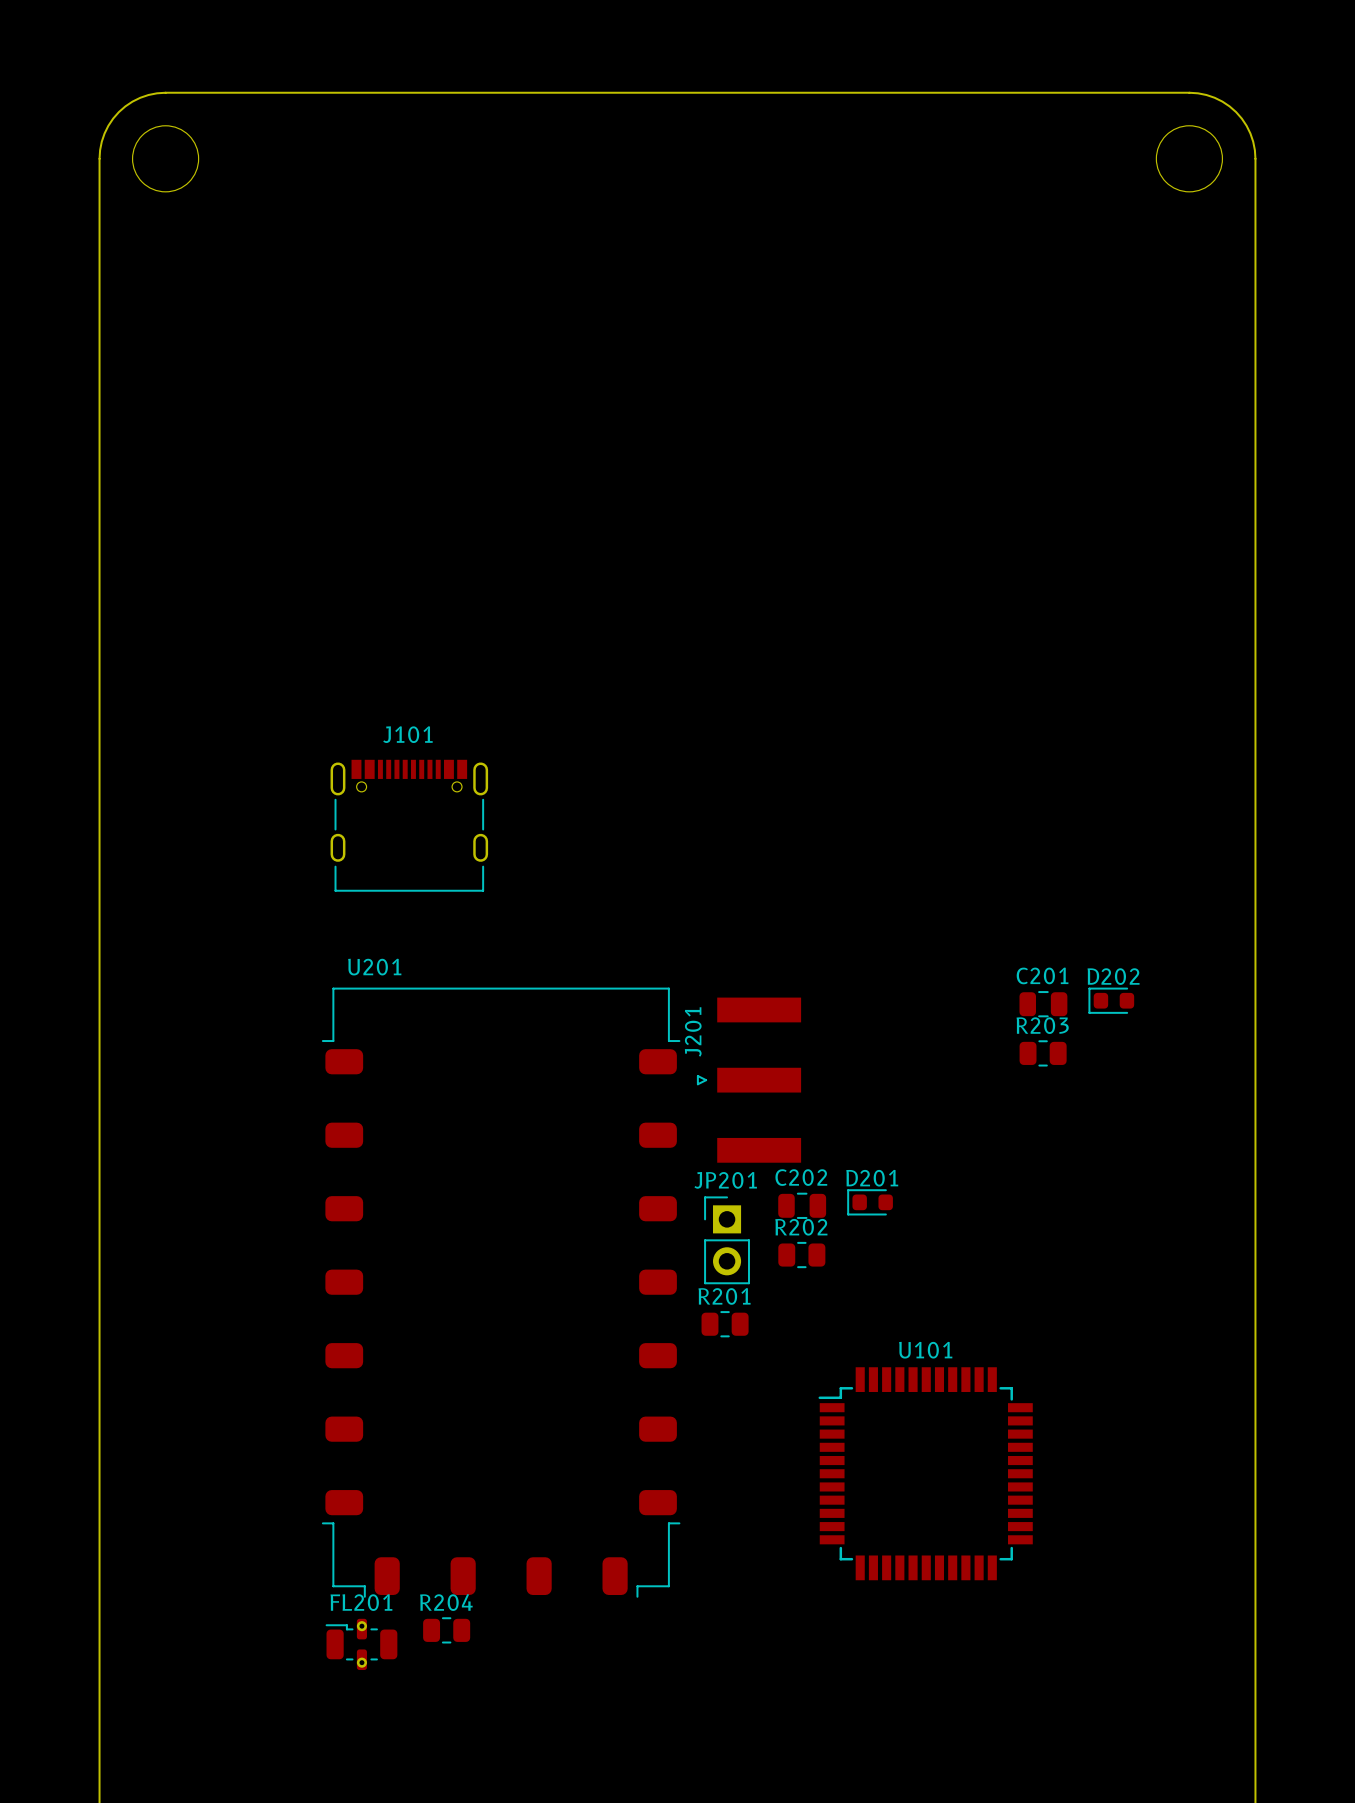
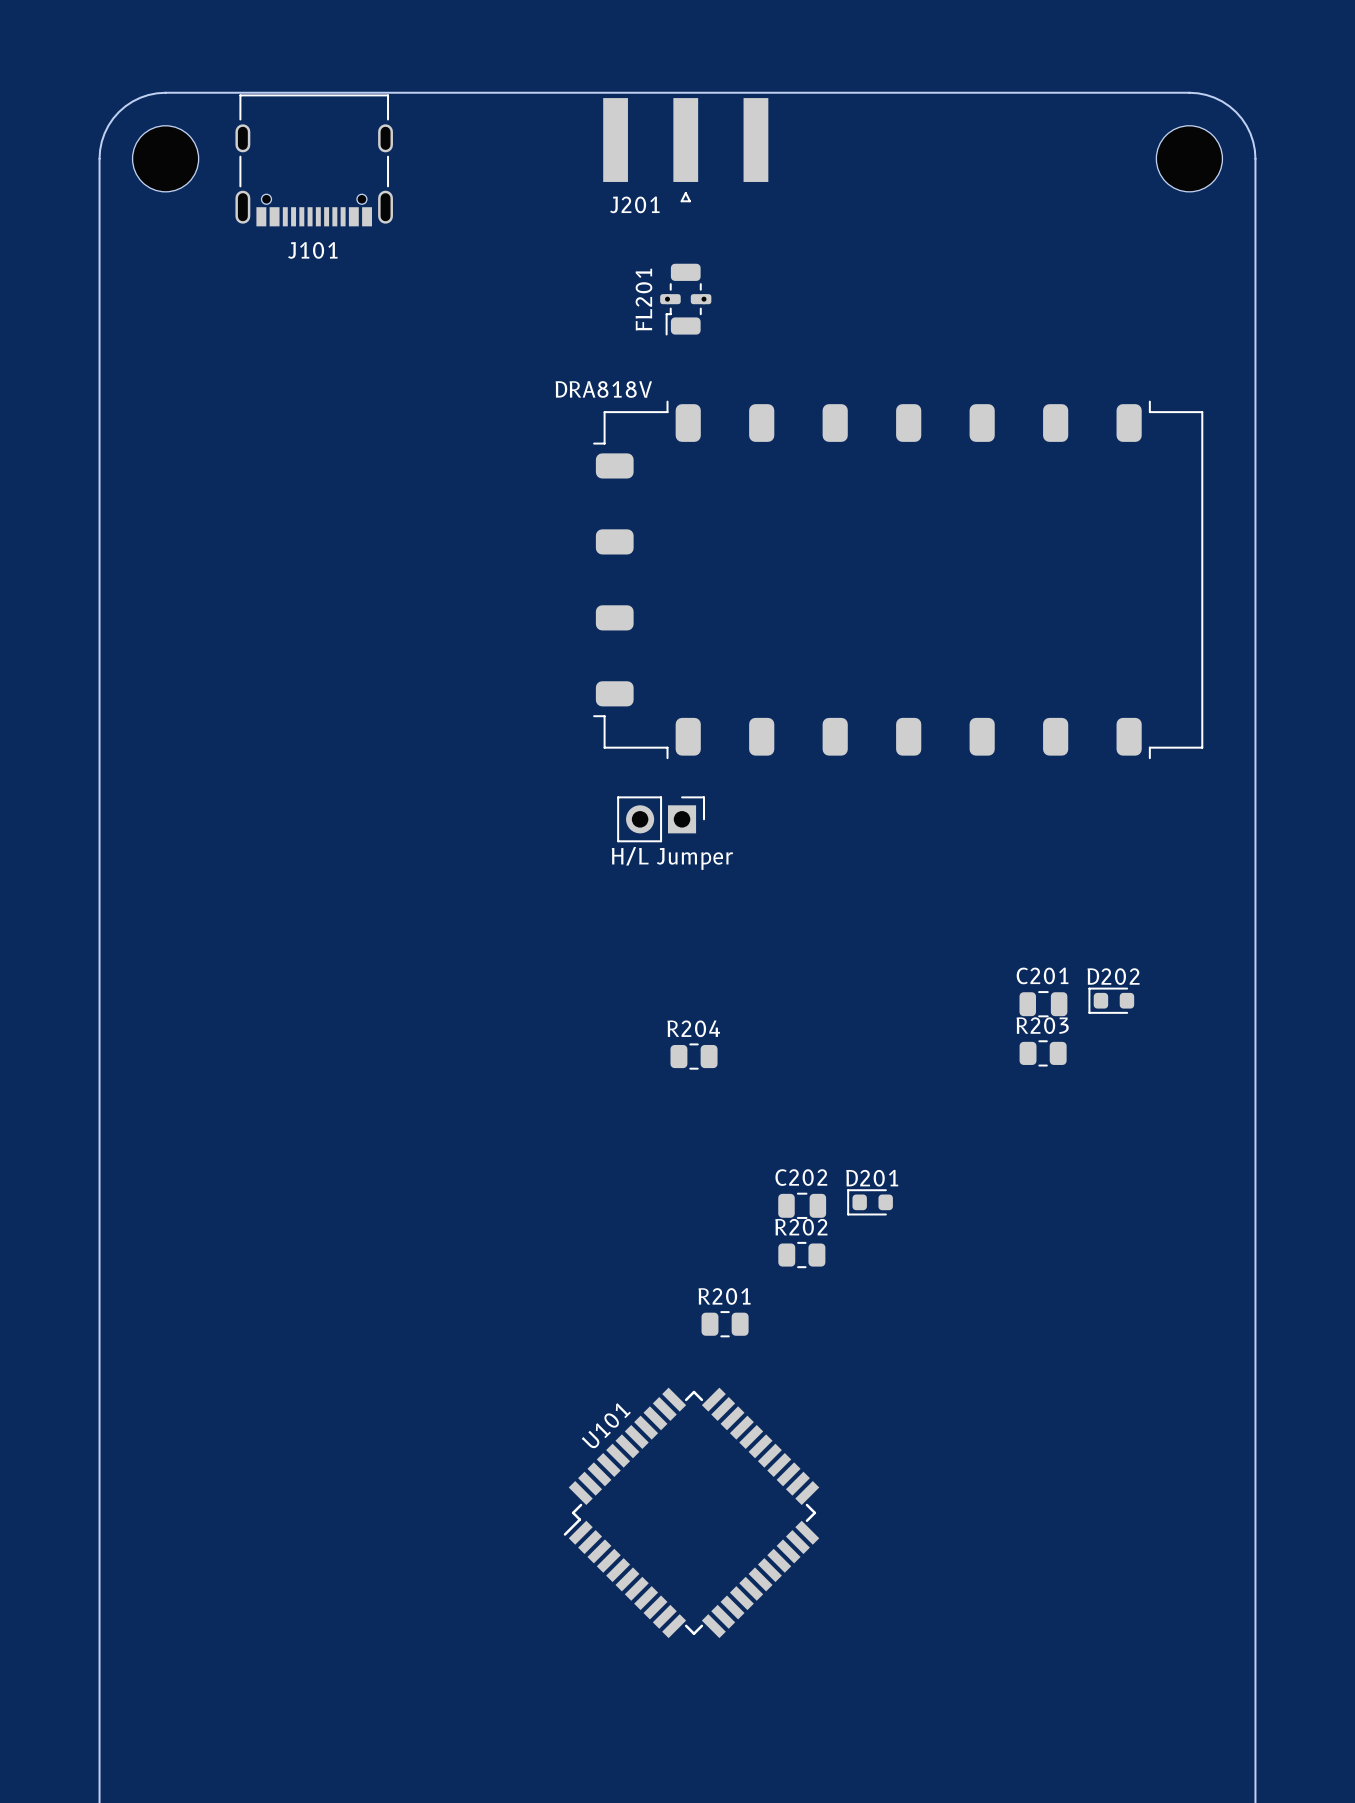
part: none -> DRA818V (898, 579)
part: none -> H/L Jumper (661, 819)
J101 rotation: 0° (409, 825) -> 180° (314, 160)
J101 position: (409, 825) -> (314, 160)
J201 rotation: 0° (749, 1080) -> 90° counterclockwise (685, 150)
J201 position: (749, 1080) -> (685, 150)
JP201: (727, 1240) -> none
U201: (501, 1292) -> none
U101 rotation: 0° (925, 1473) -> 45° counterclockwise (691, 1512)
U101 position: (925, 1473) -> (691, 1512)
R204 position: (446, 1630) -> (694, 1056)
FL201 rotation: 0° (361, 1644) -> 90° counterclockwise (685, 299)
FL201 position: (361, 1644) -> (685, 299)

